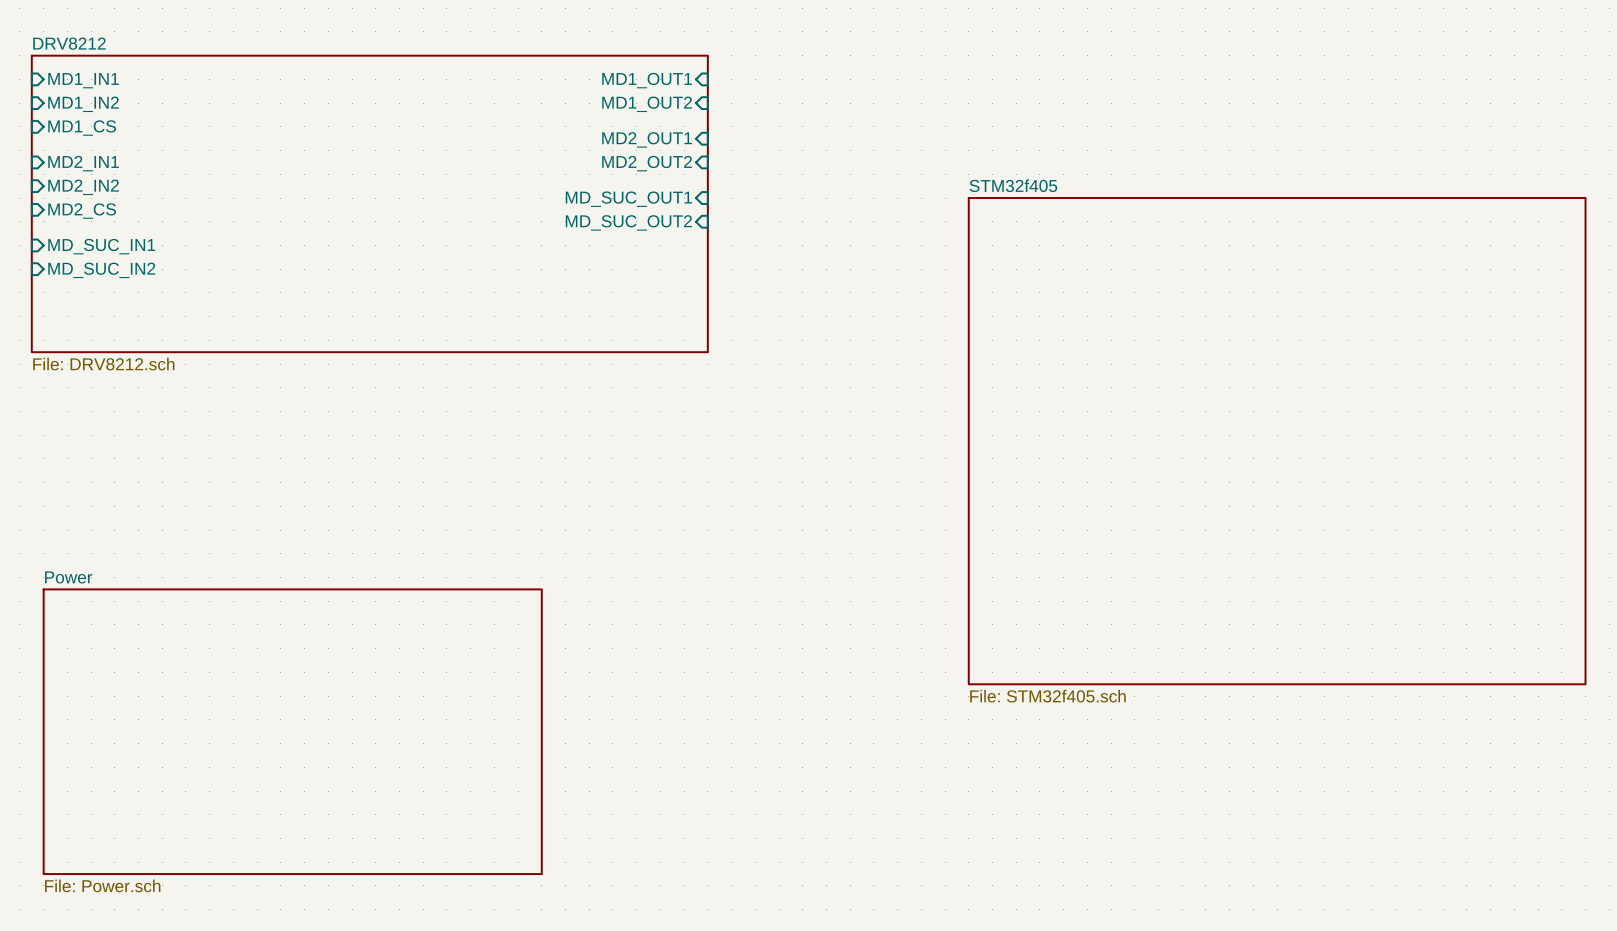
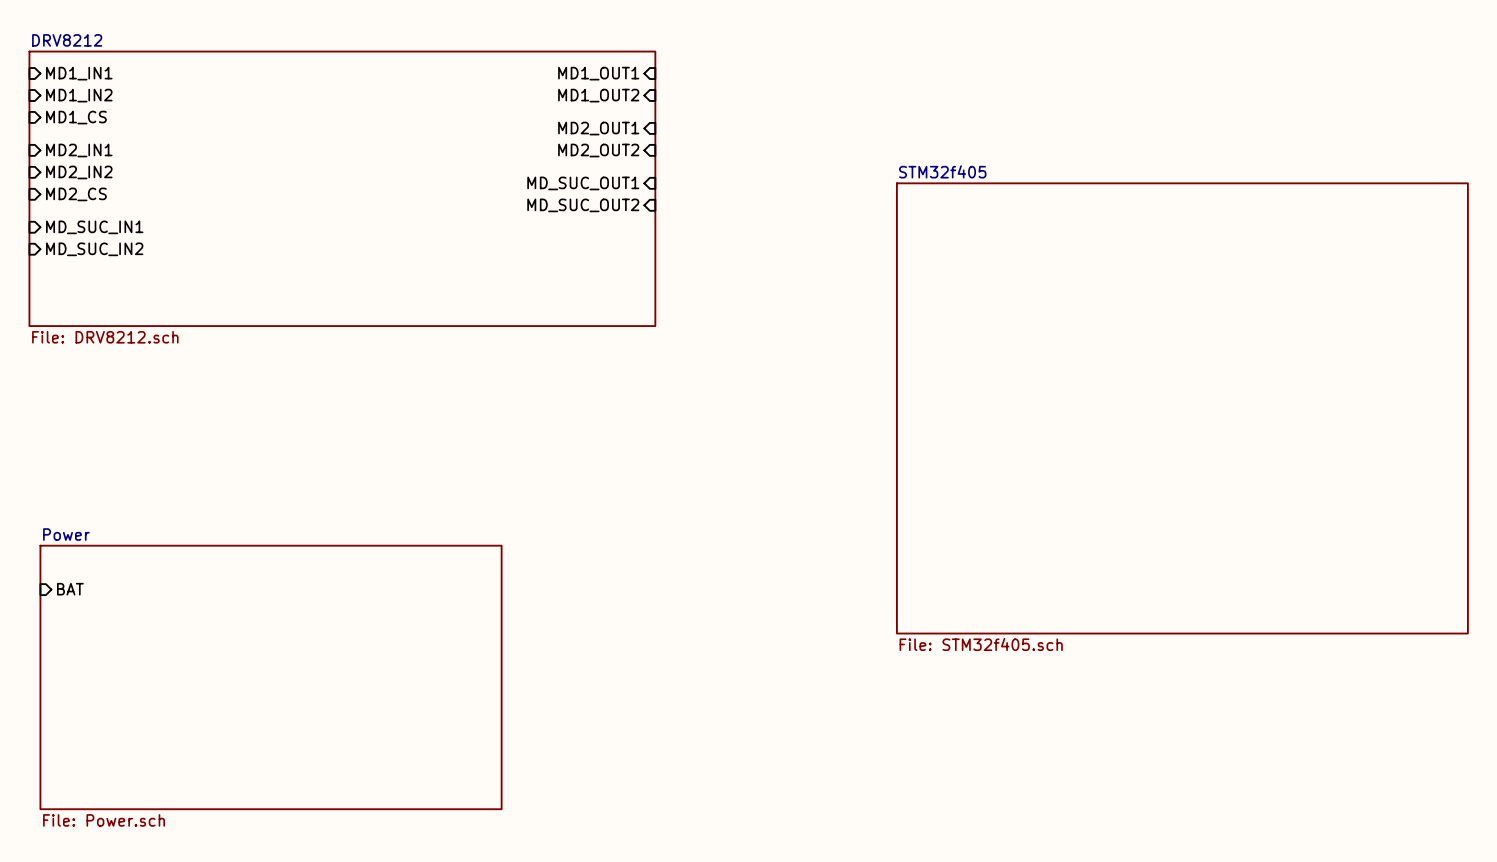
sheet pin: none -> BAT (70, 589)

